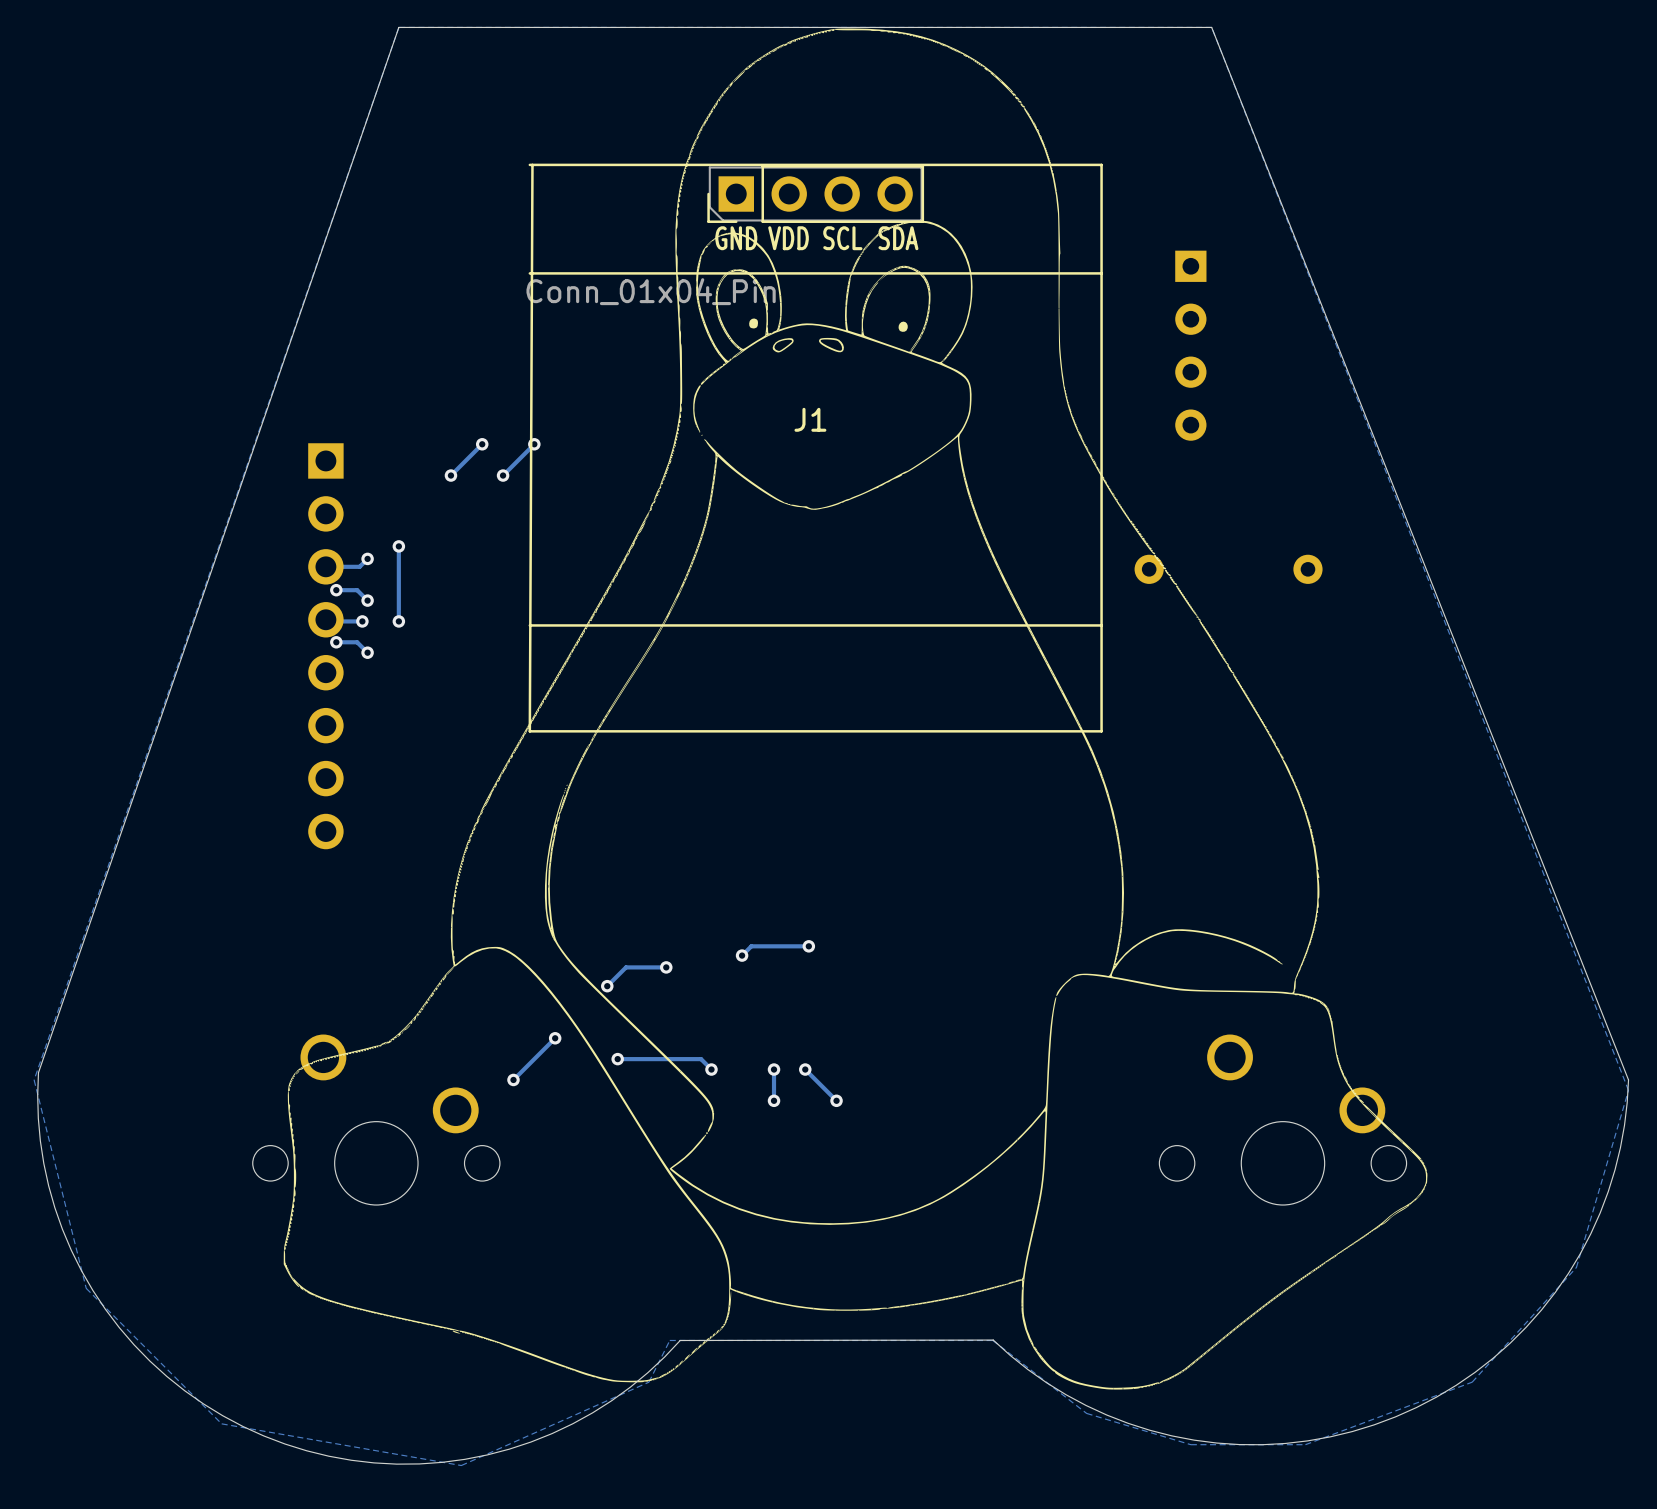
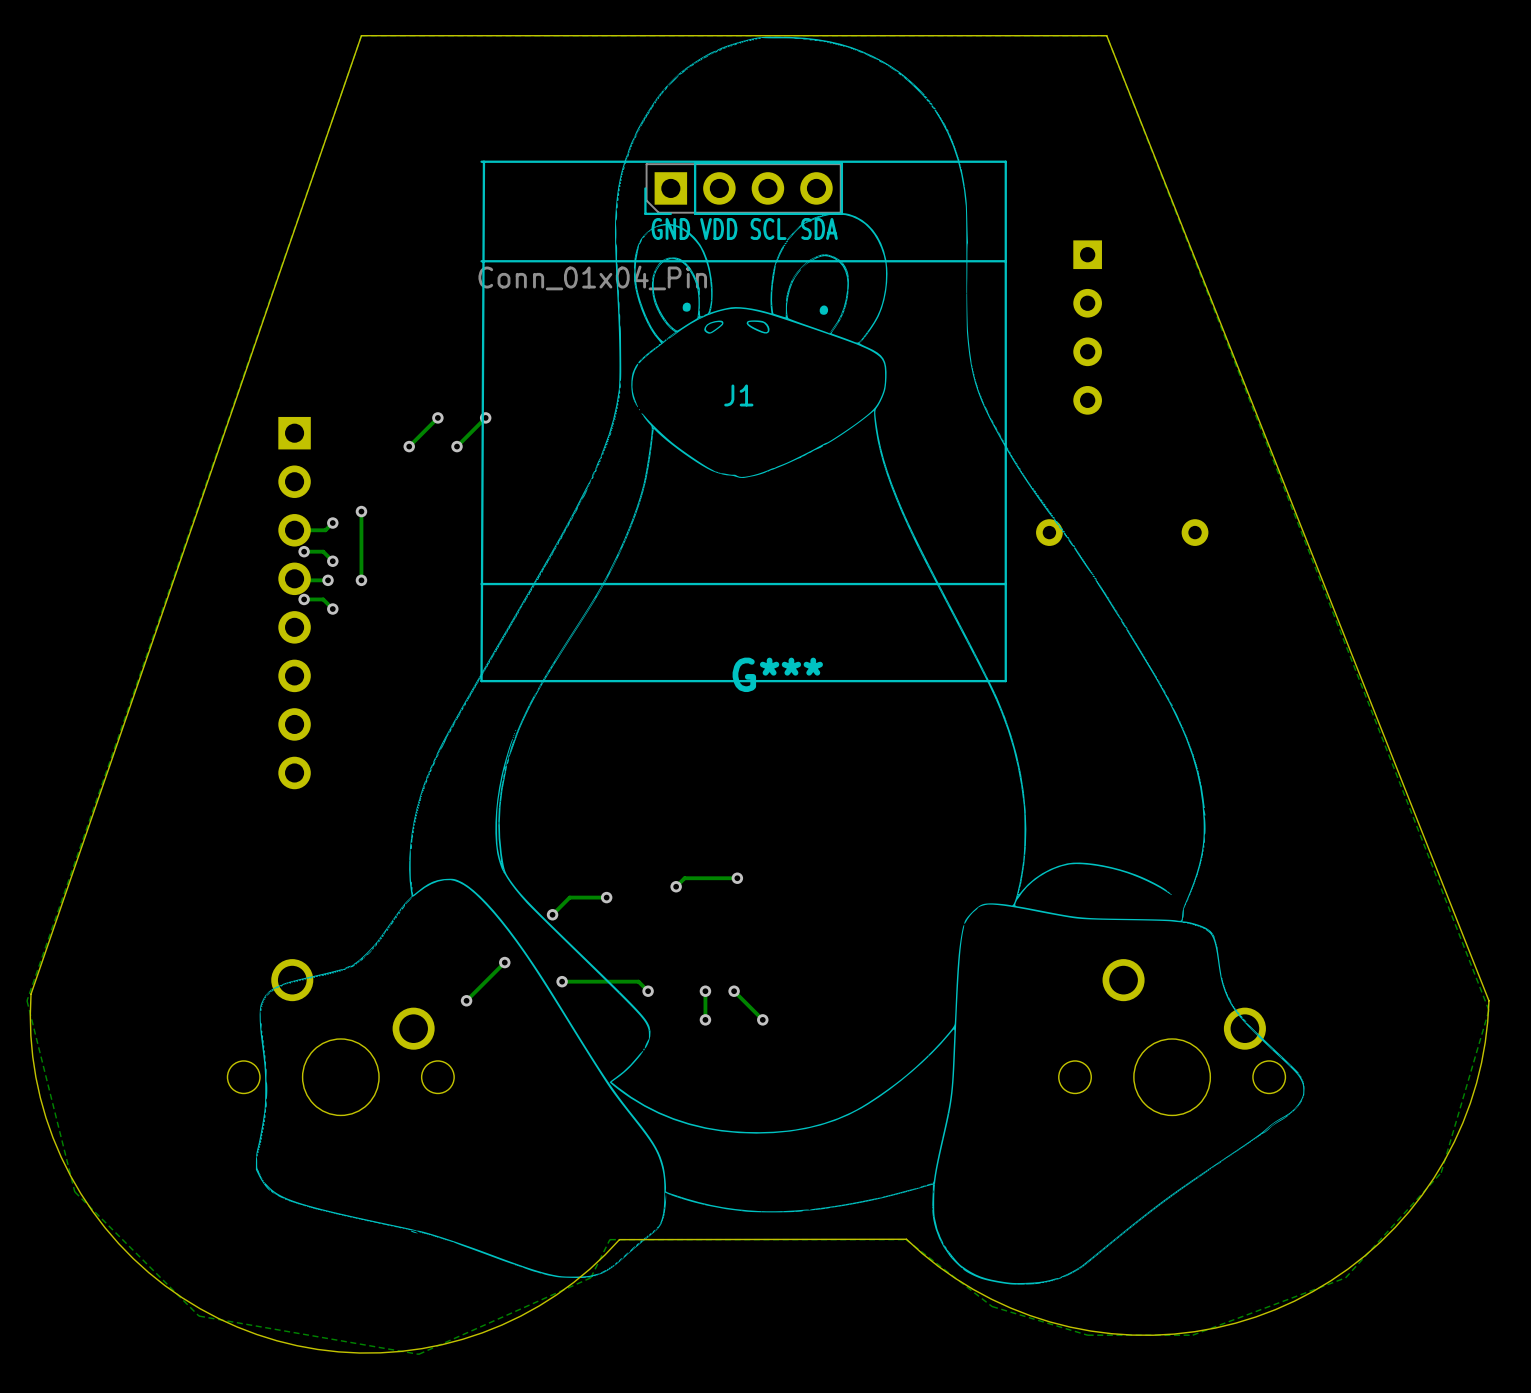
G***: none -> (780, 660)

